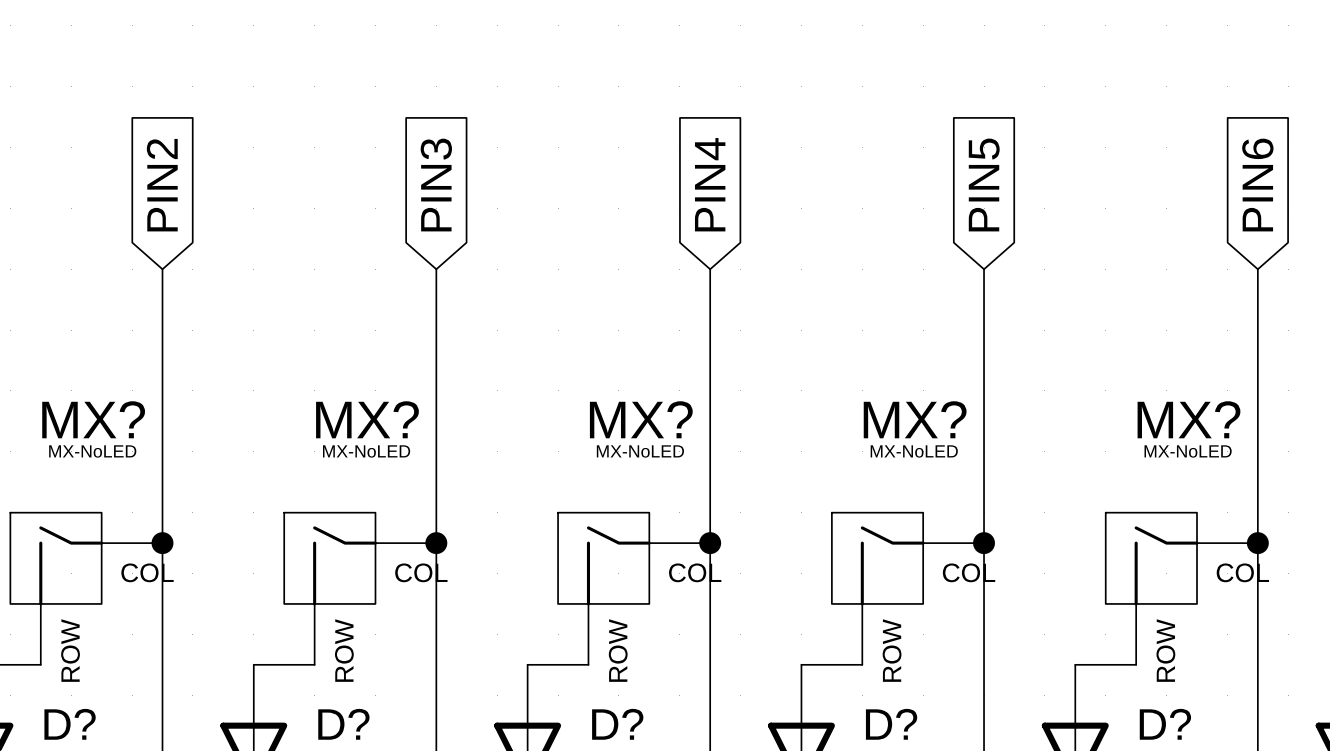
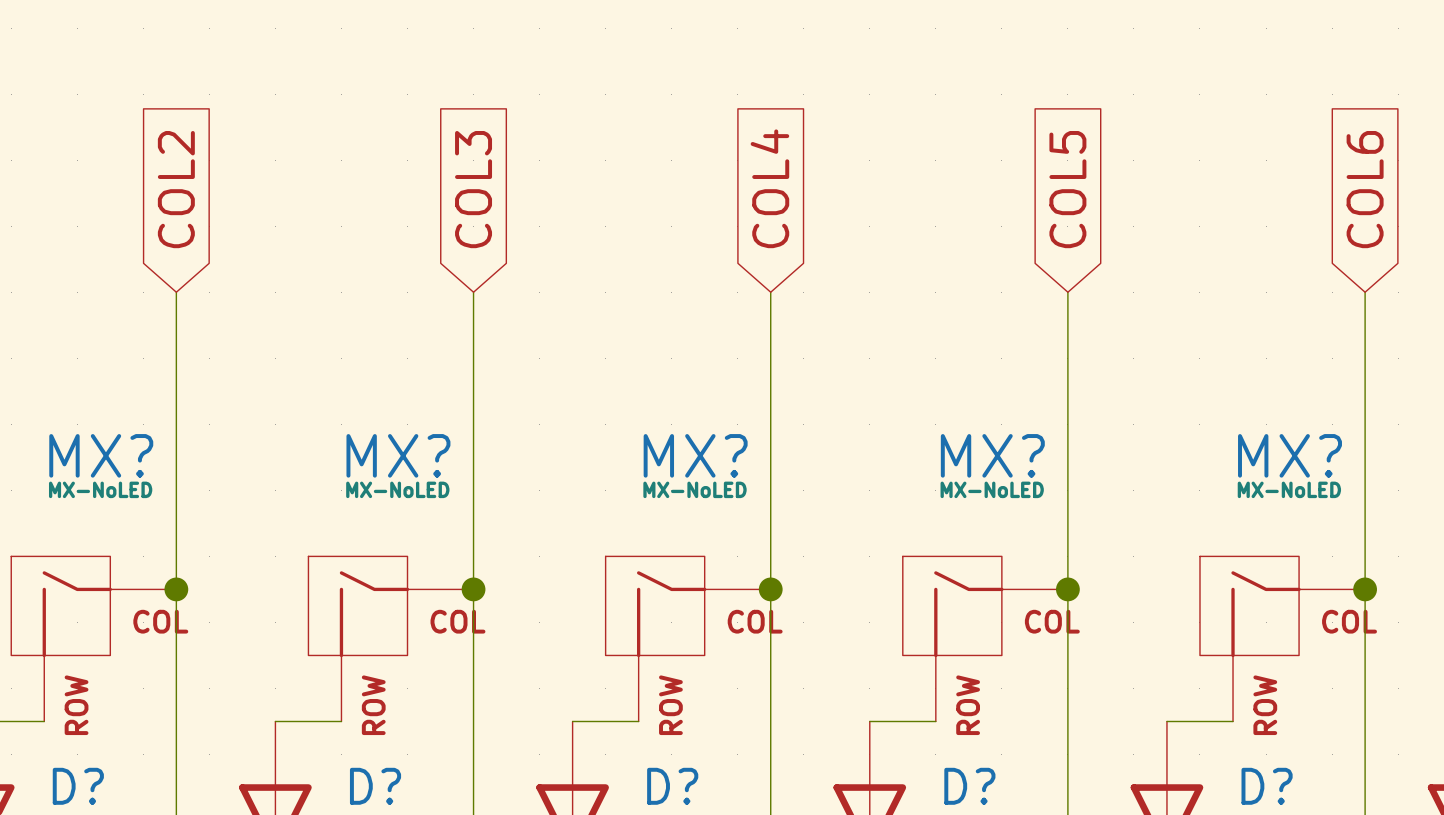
global label: PIN4 (710, 184) -> COL4 (769, 188)
global label: PIN5 (984, 184) -> COL5 (1067, 189)
global label: PIN2 (162, 185) -> COL2 (176, 189)
global label: PIN3 (436, 185) -> COL3 (473, 189)
global label: PIN6 (1257, 185) -> COL6 (1365, 189)

